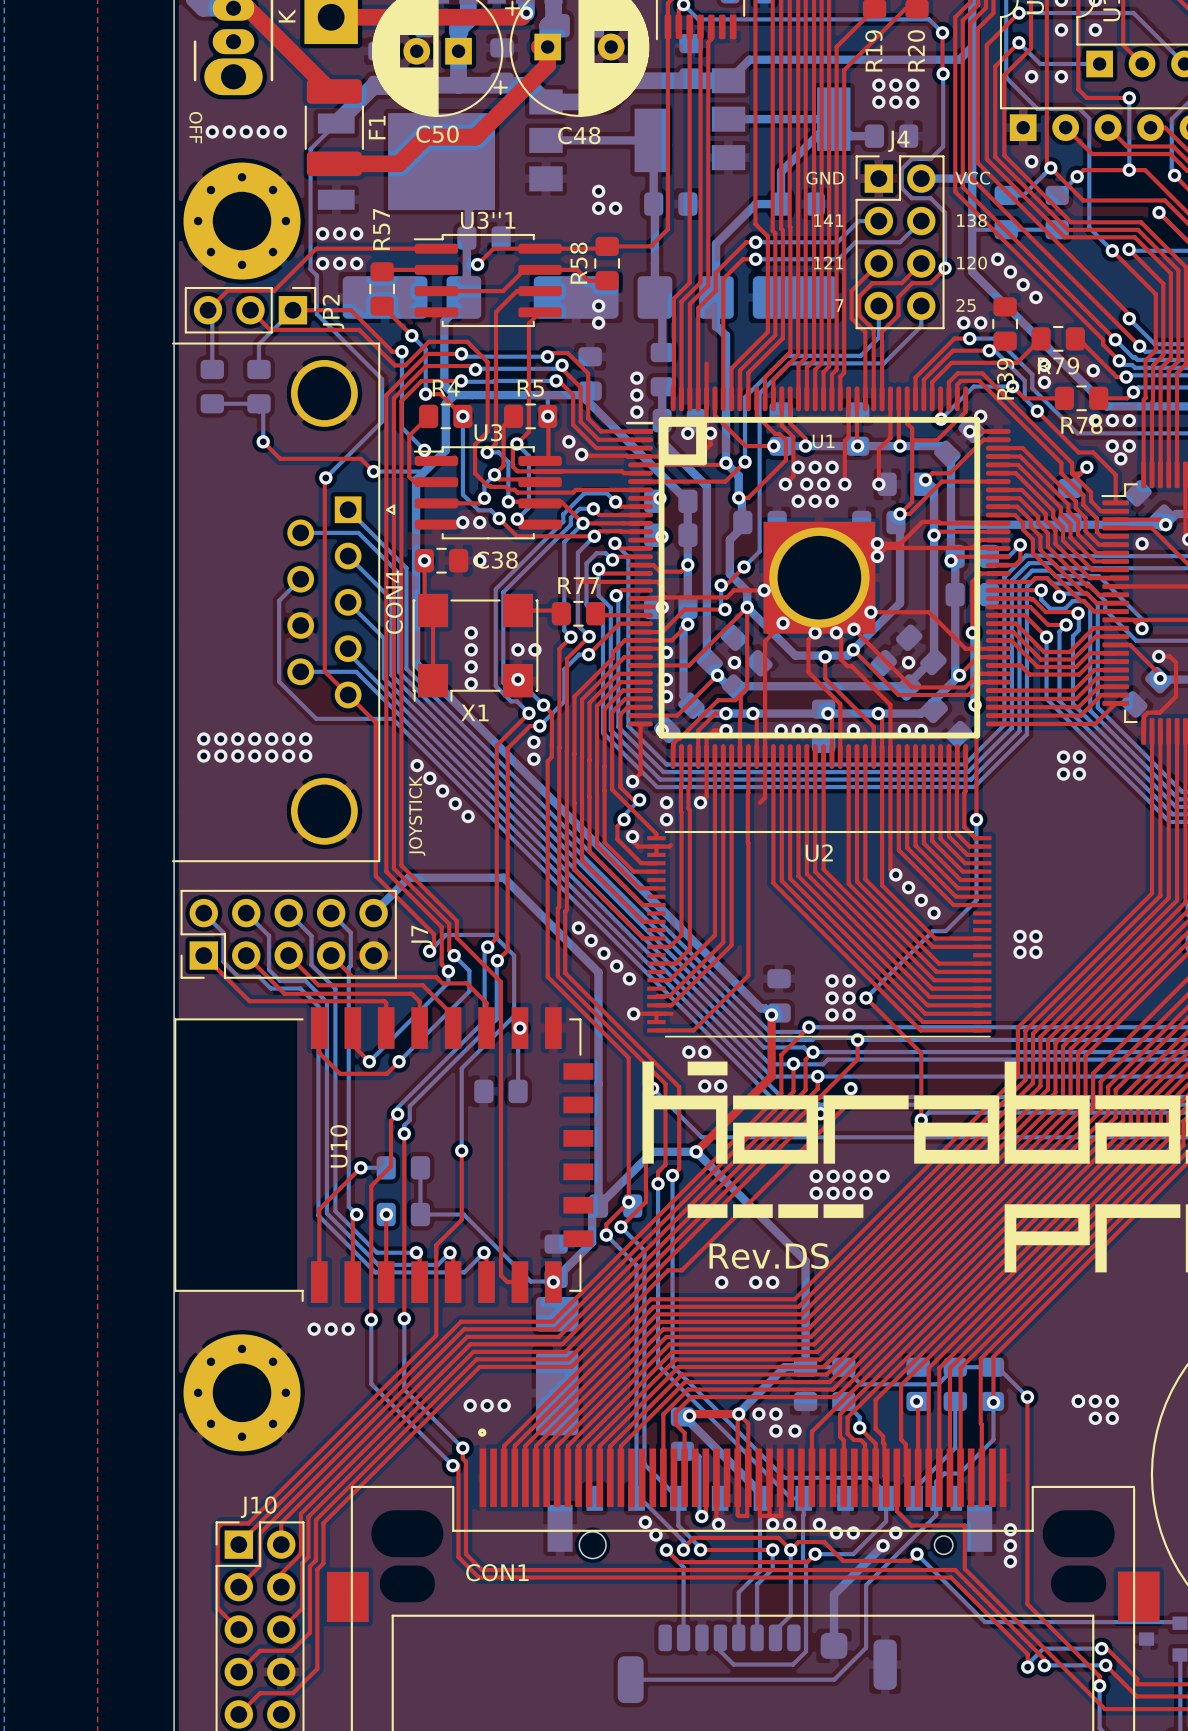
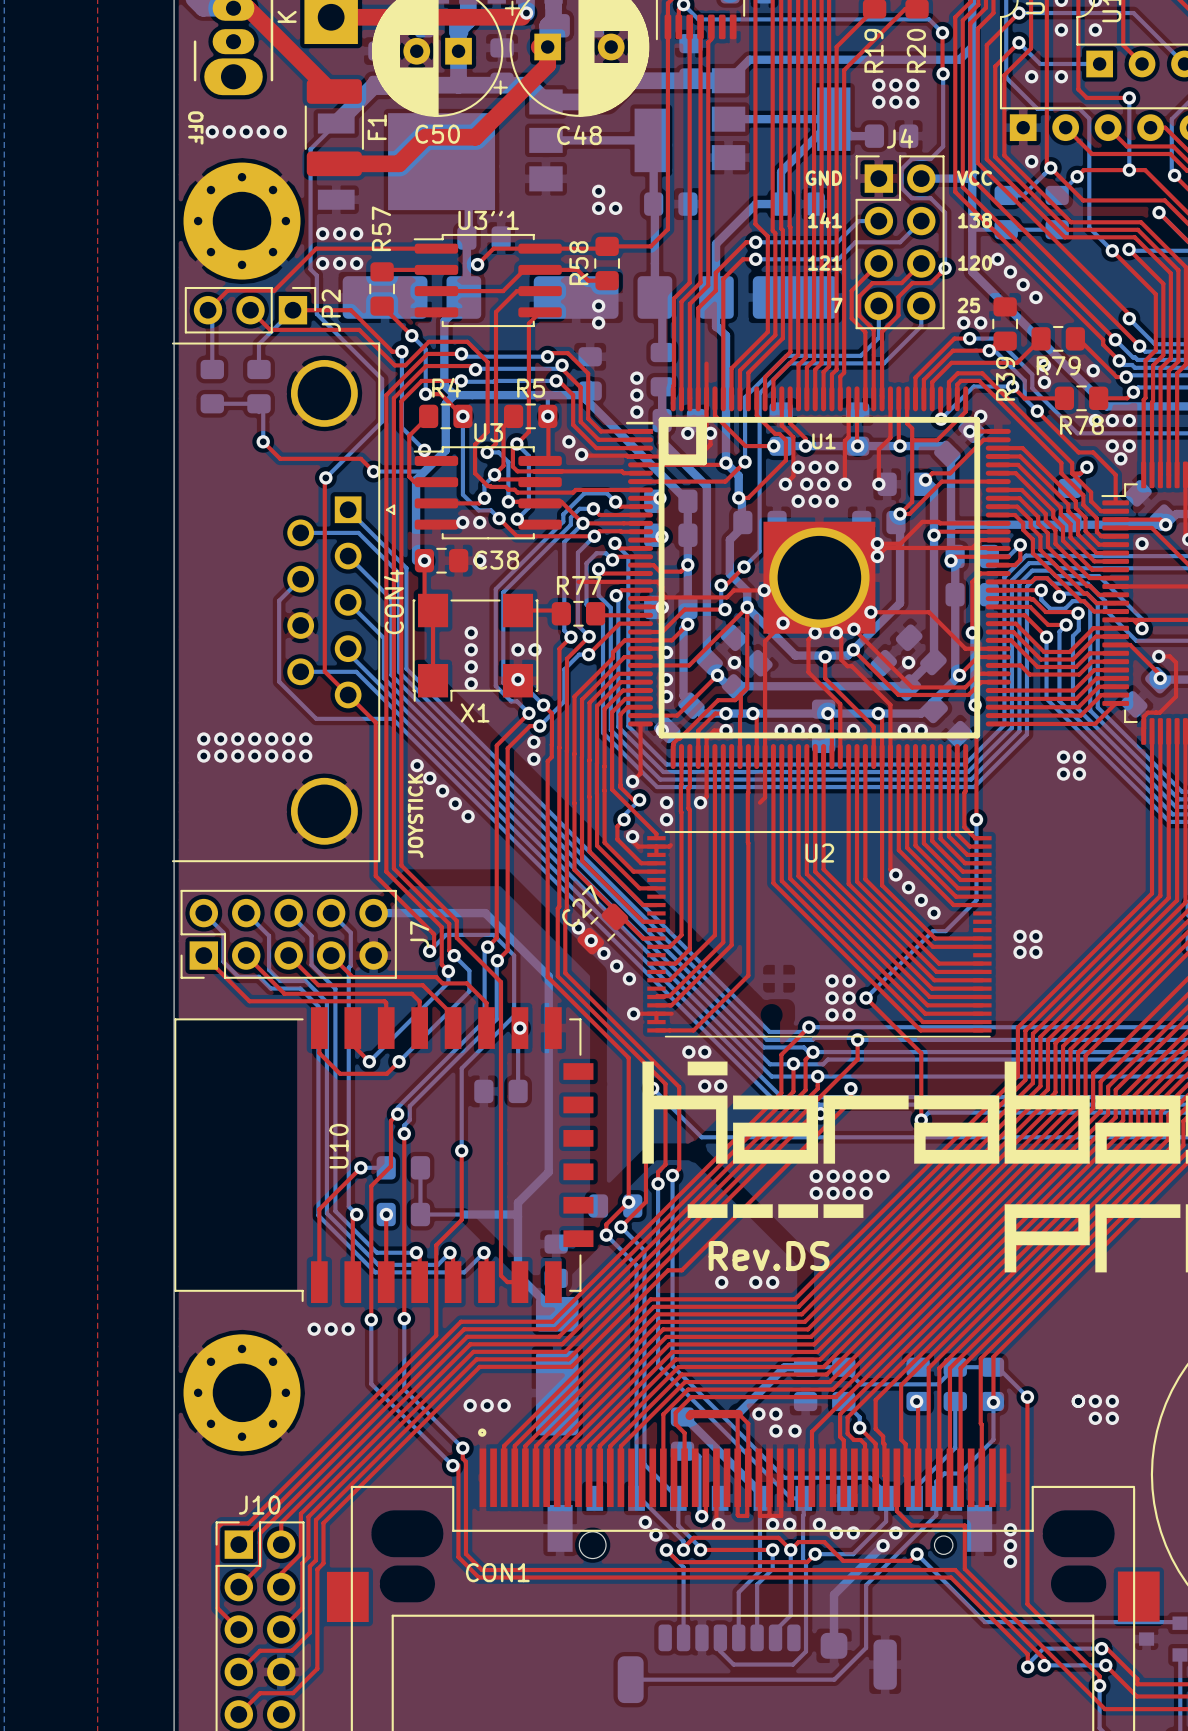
bottom track: (416, 560) (416, 663) (760, 1008) (764, 1008) (771, 1014) -> none
bottom track: (373, 913) (408, 877) (503, 877) (598, 972) (598, 1206) (652, 1151) (696, 1151) (805, 1261) (805, 1367) -> (373, 913) (485, 913) (548, 976) (548, 1172) (517, 1202) (517, 1275) (557, 1314)
C27 side: bottom (779, 995) -> top (602, 929)
top track: (771, 1014) (771, 1076) (696, 1151) -> none
via: (771, 1014) -> none
via: (696, 1151) -> none
bottom track: (592, 1212) (592, 1242) (556, 1278) -> none
bottom track: (463, 1214) (530, 1281) (553, 1281) -> (463, 1214) (515, 1214) (517, 1216)
via: (553, 1282) -> none
via: (738, 1414) -> none
via: (689, 1415) -> none

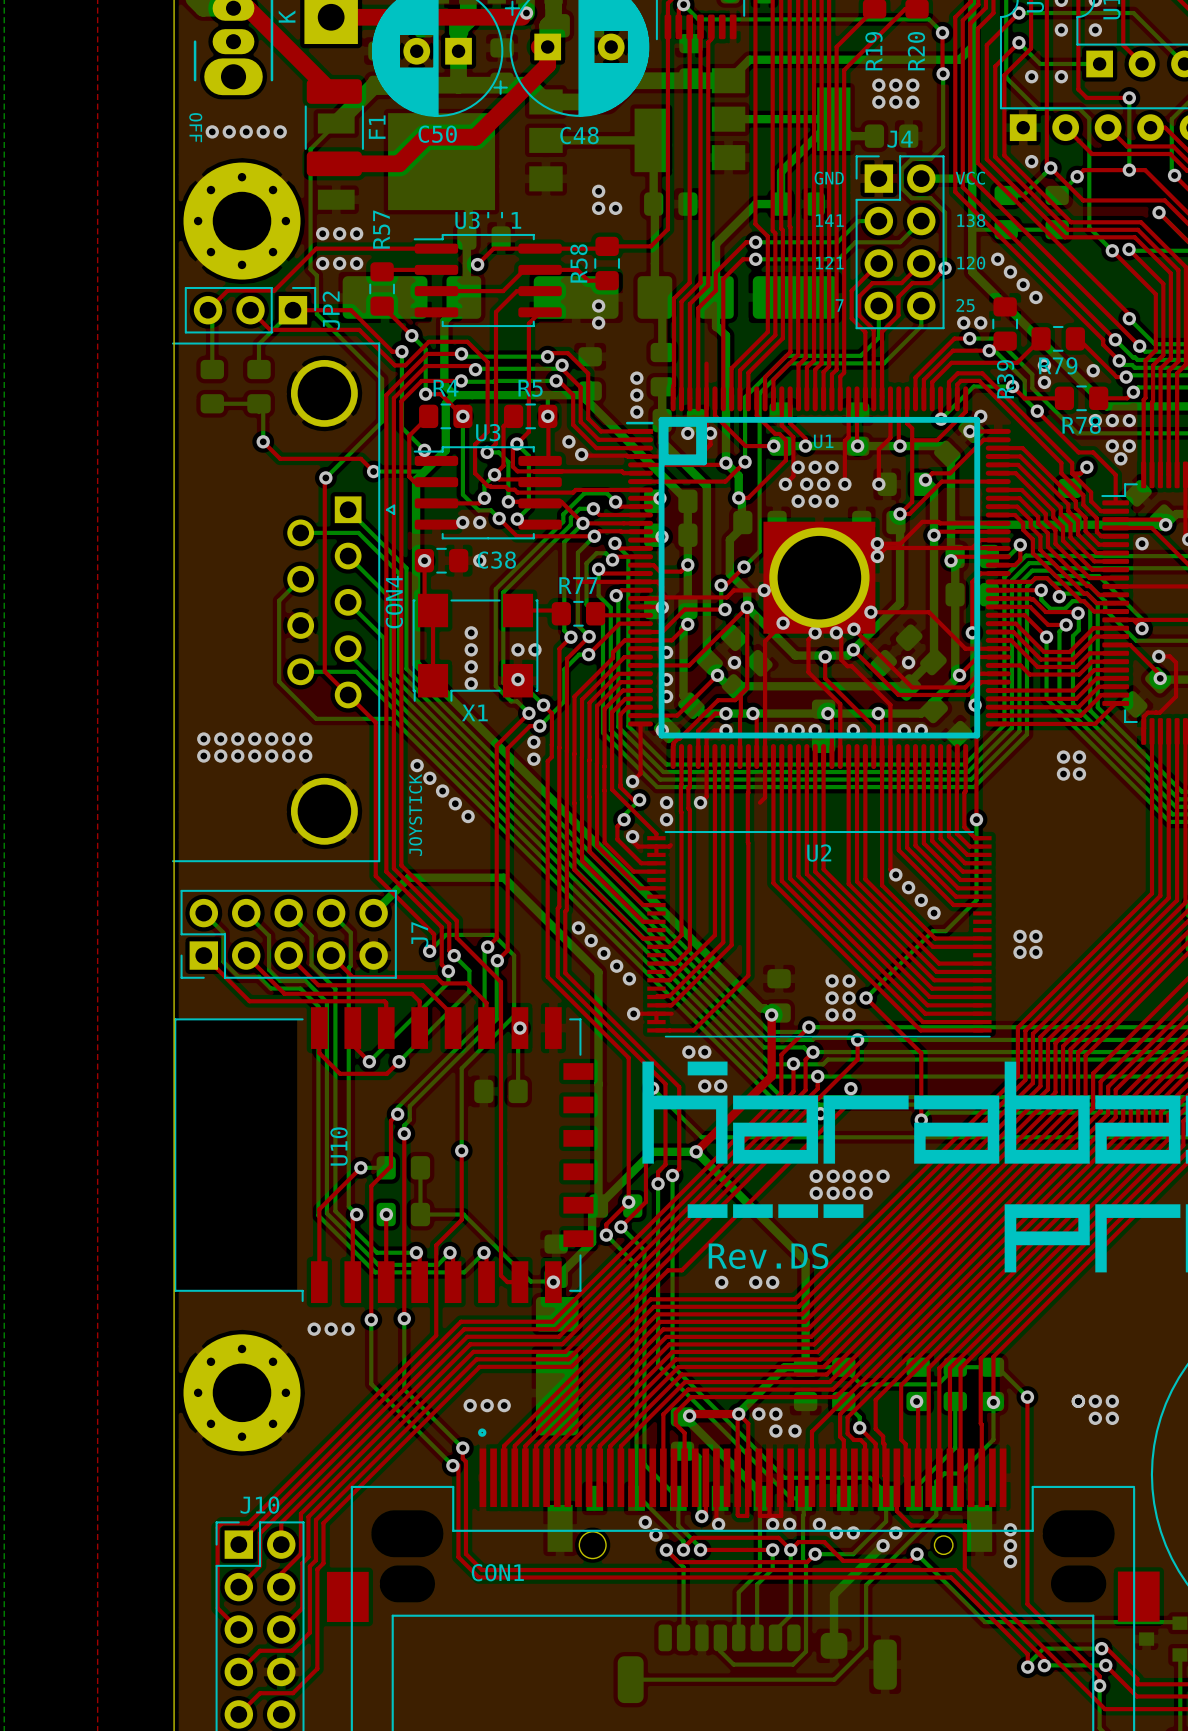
bottom track: none -> (416, 560) (416, 663) (760, 1008) (764, 1008) (771, 1014)
bottom track: (373, 913) (485, 913) (548, 976) (548, 1172) (517, 1202) (517, 1275) (557, 1314) -> (373, 913) (408, 877) (503, 877) (598, 972) (598, 1206) (652, 1151) (696, 1151) (805, 1261) (805, 1367)
C27 side: top (602, 929) -> bottom (779, 995)
top track: none -> (771, 1014) (771, 1076) (696, 1151)
via: none -> (771, 1014)
via: none -> (696, 1151)
bottom track: none -> (592, 1212) (592, 1242) (556, 1278)
bottom track: (463, 1214) (515, 1214) (517, 1216) -> (463, 1214) (530, 1281) (553, 1281)
via: none -> (553, 1282)
via: none -> (738, 1414)
via: none -> (689, 1415)

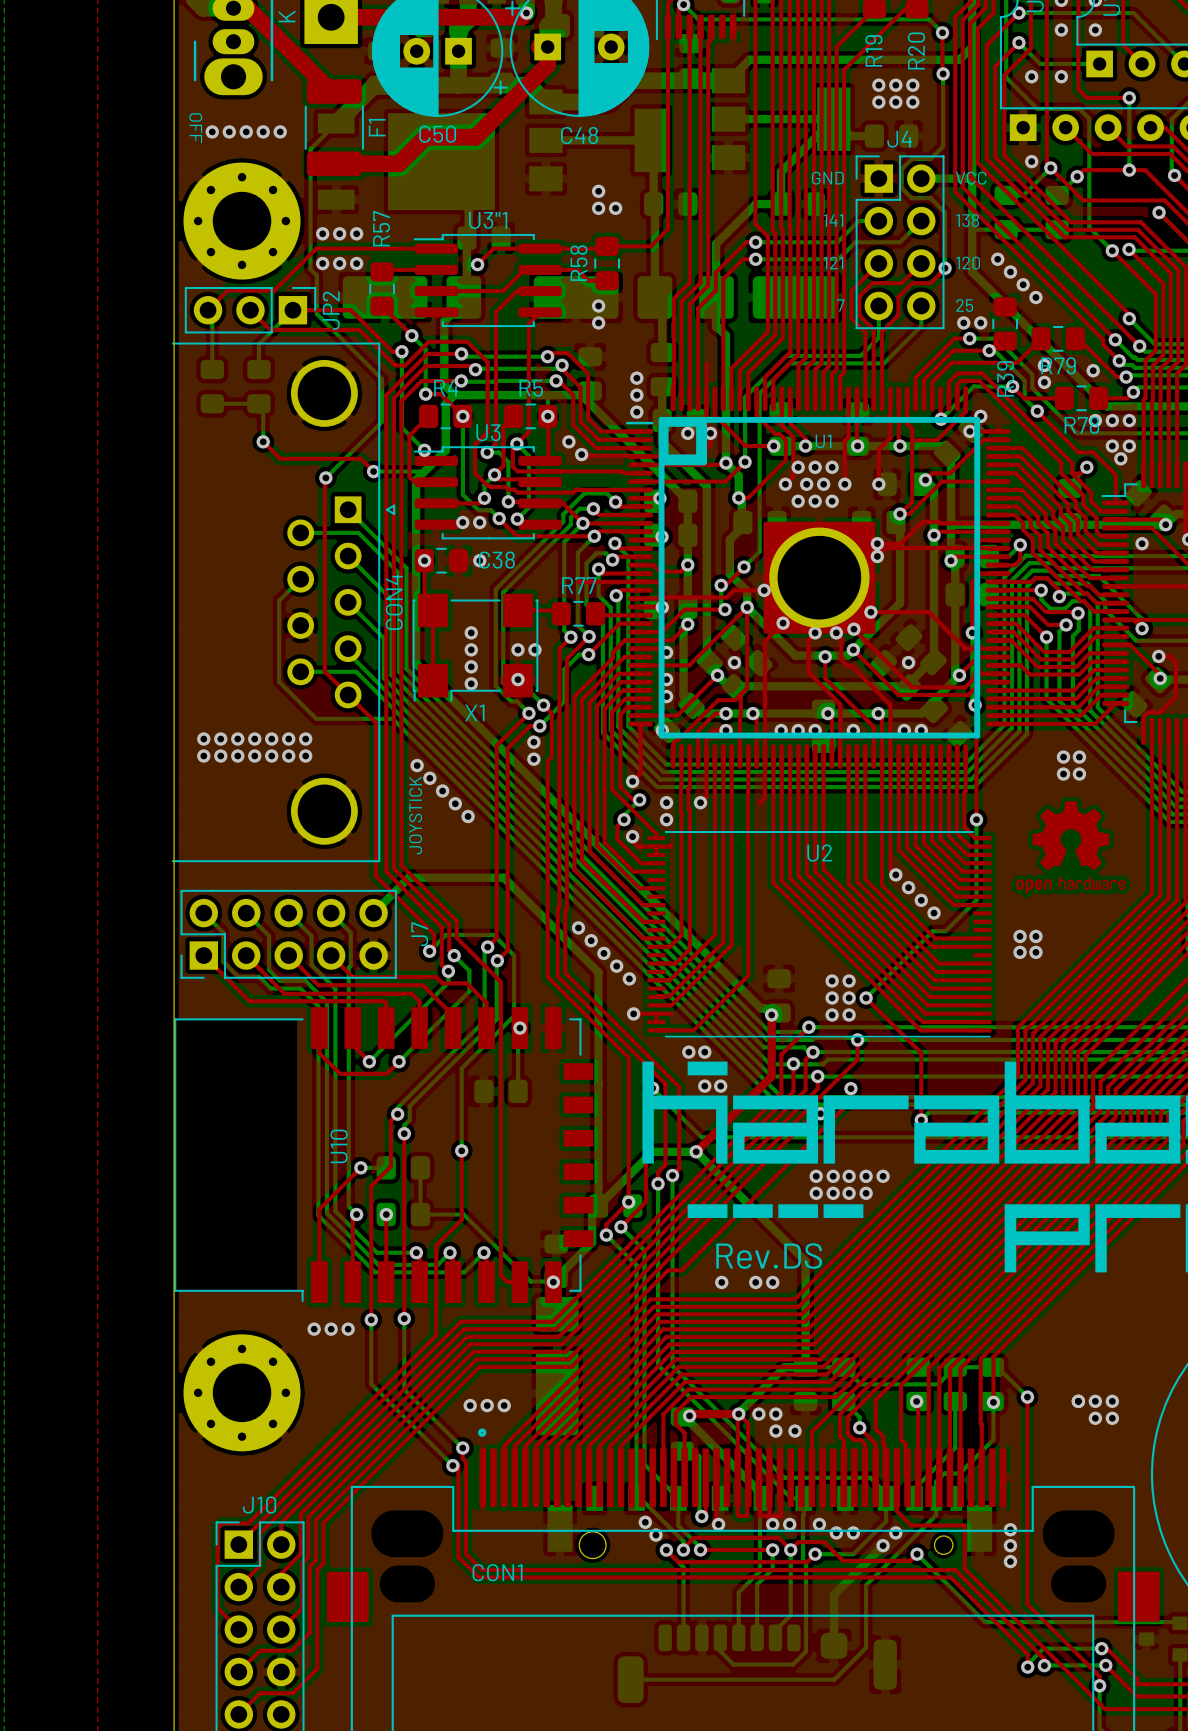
drawing: none -> [1016, 801, 1126, 894]

